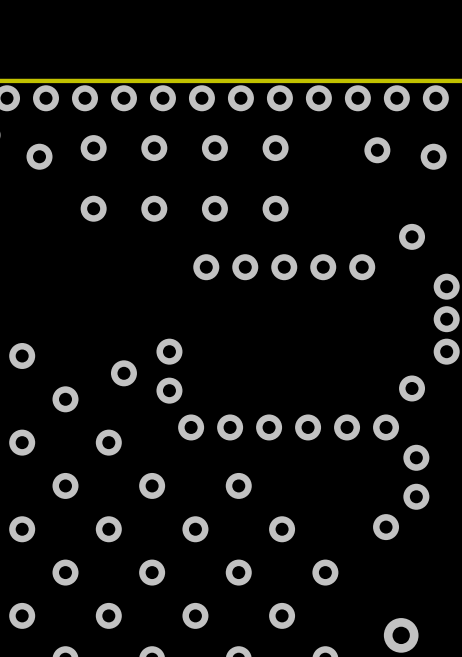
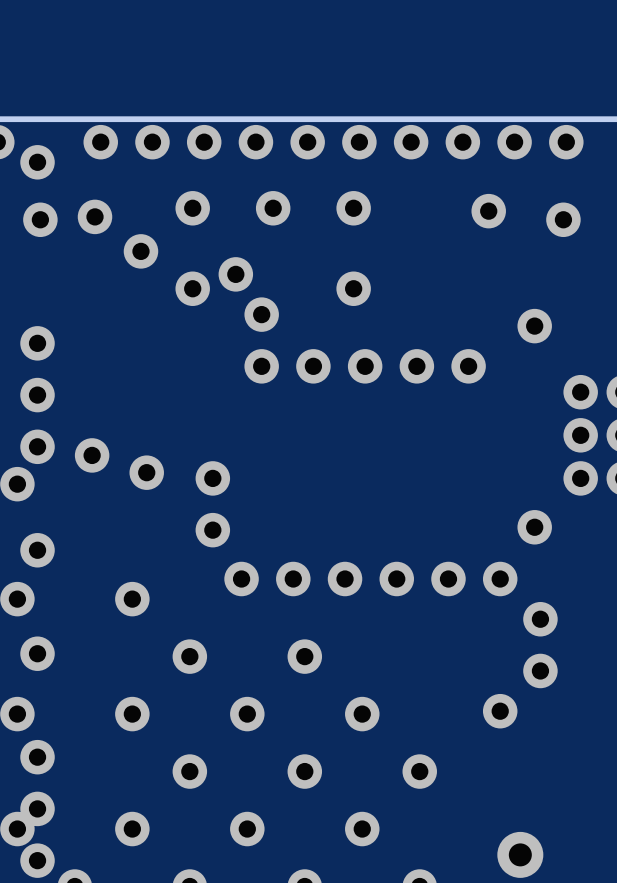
via position: (46, 98) -> (37, 162)
via position: (93, 148) -> (95, 216)
via: none -> (140, 251)
via: none -> (235, 274)
via: (93, 208) -> none
via position: (214, 208) -> (261, 314)
via: none -> (37, 343)
via: none -> (37, 395)
via: none -> (37, 446)
via: none -> (92, 455)
via position: (123, 373) -> (146, 472)
via position: (65, 399) -> (37, 550)
via position: (65, 485) -> (37, 653)
via: none -> (37, 757)
via: (65, 572) -> none
via: none -> (37, 808)
via: none -> (37, 860)

